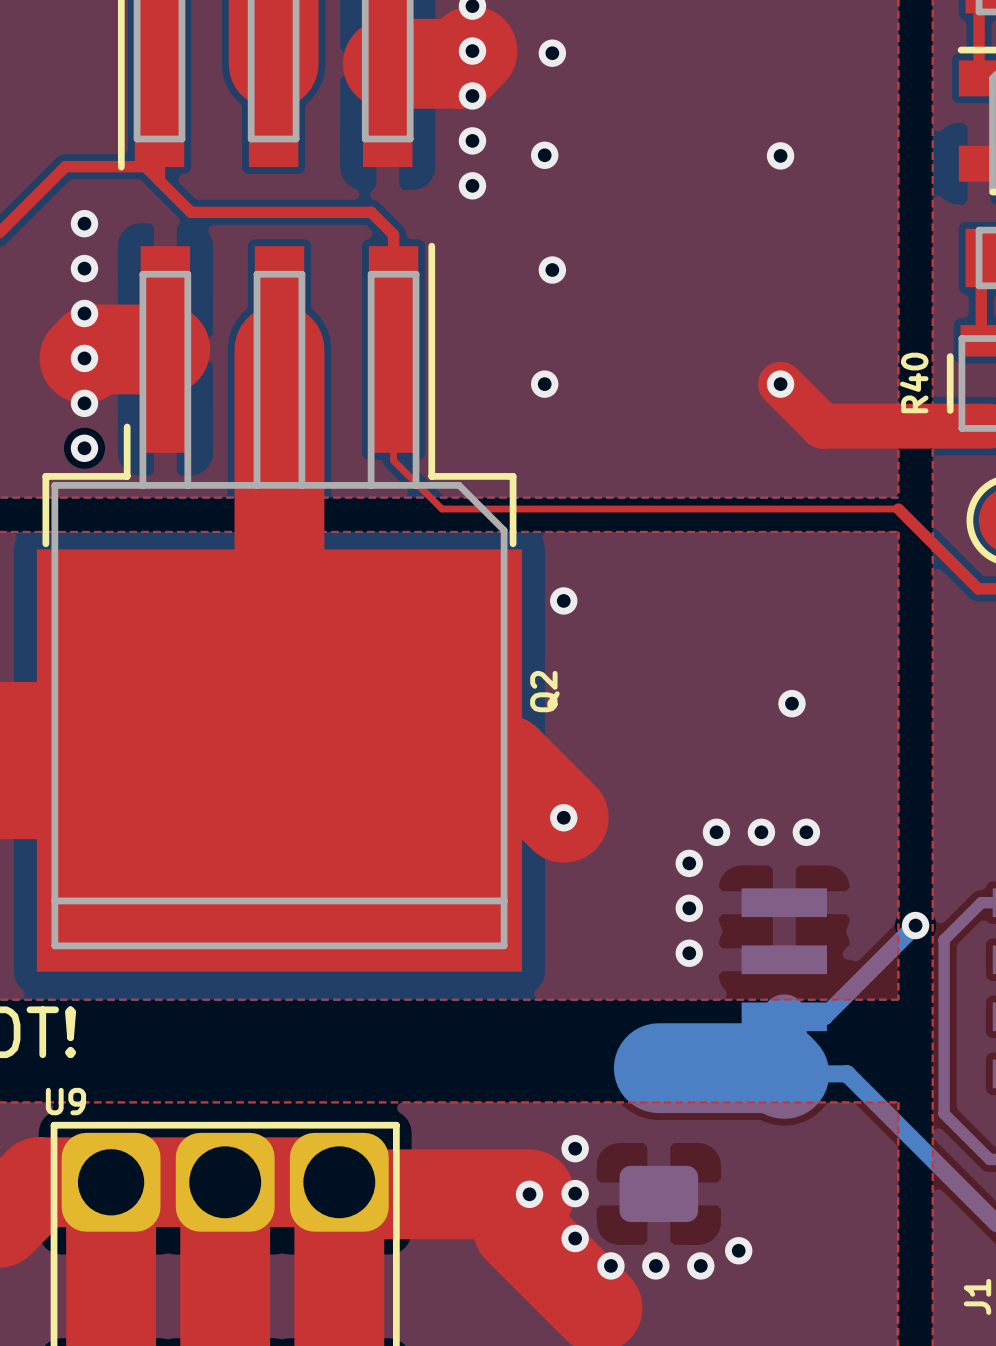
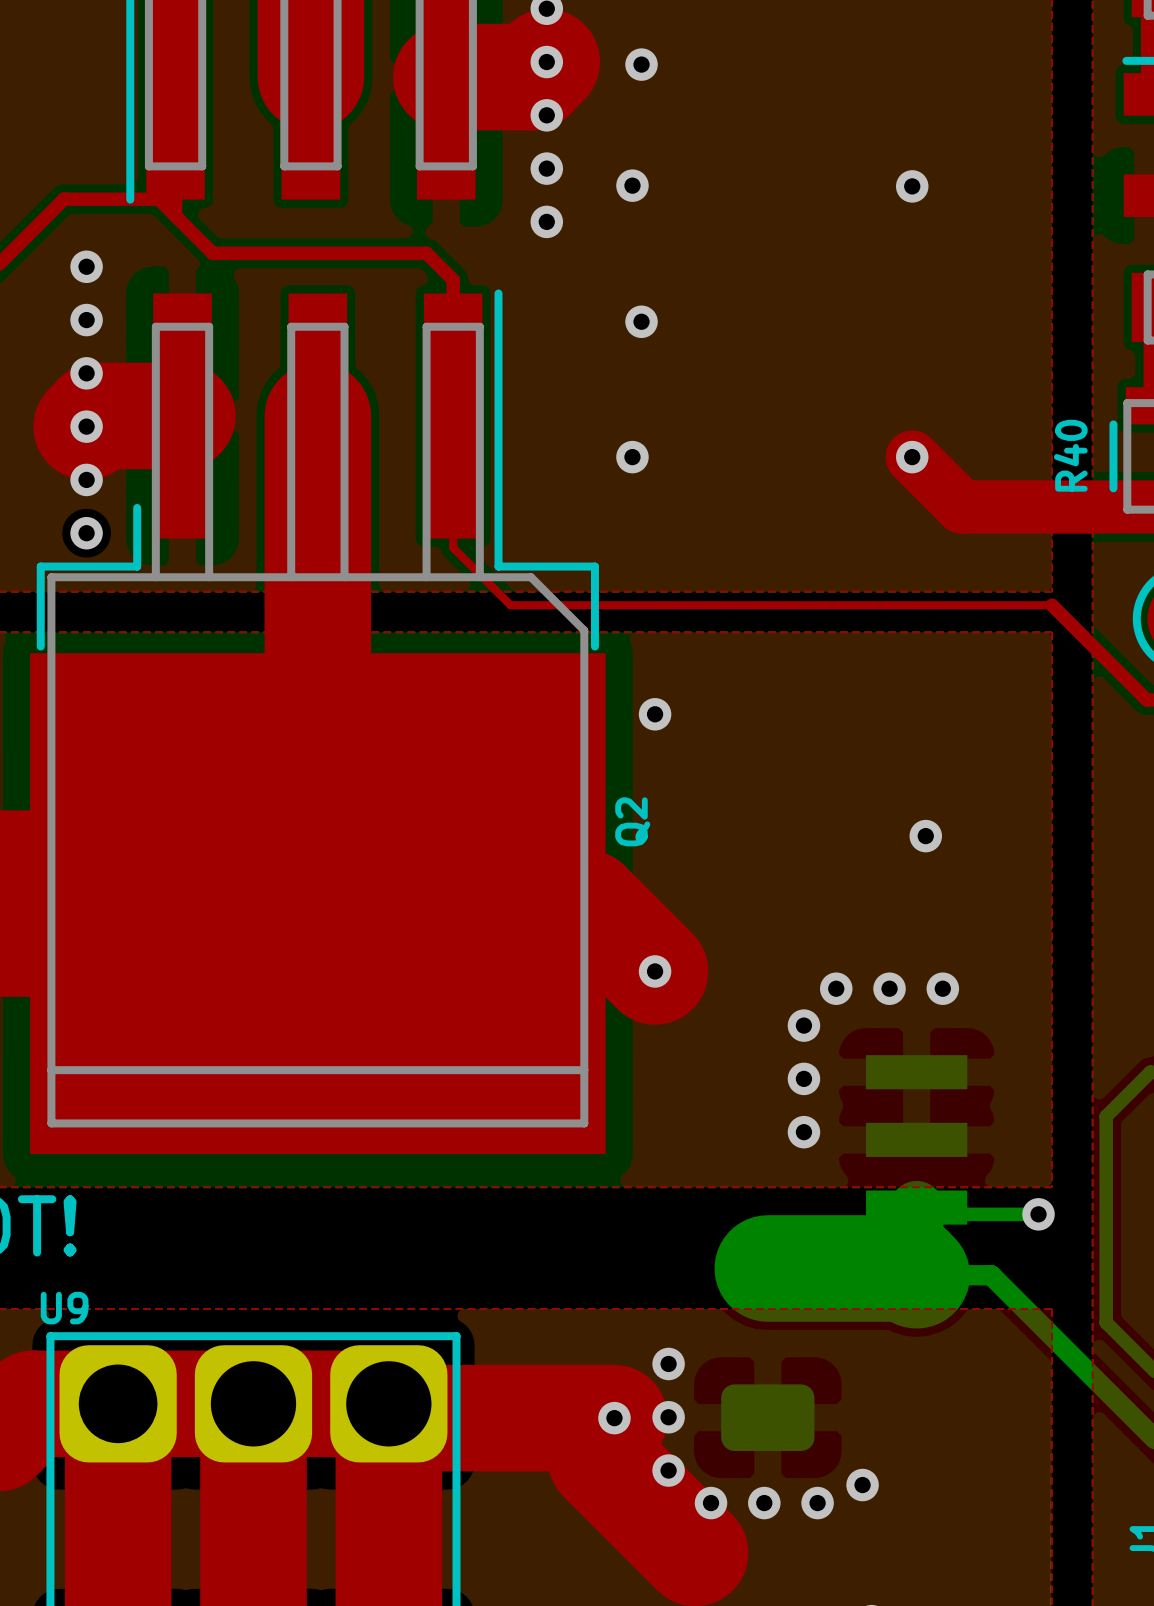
bottom track: (915, 925) (824, 1016) (784, 1016) -> (1038, 1214) (923, 1214) (916, 1207)
via position: (915, 925) -> (1038, 1214)

